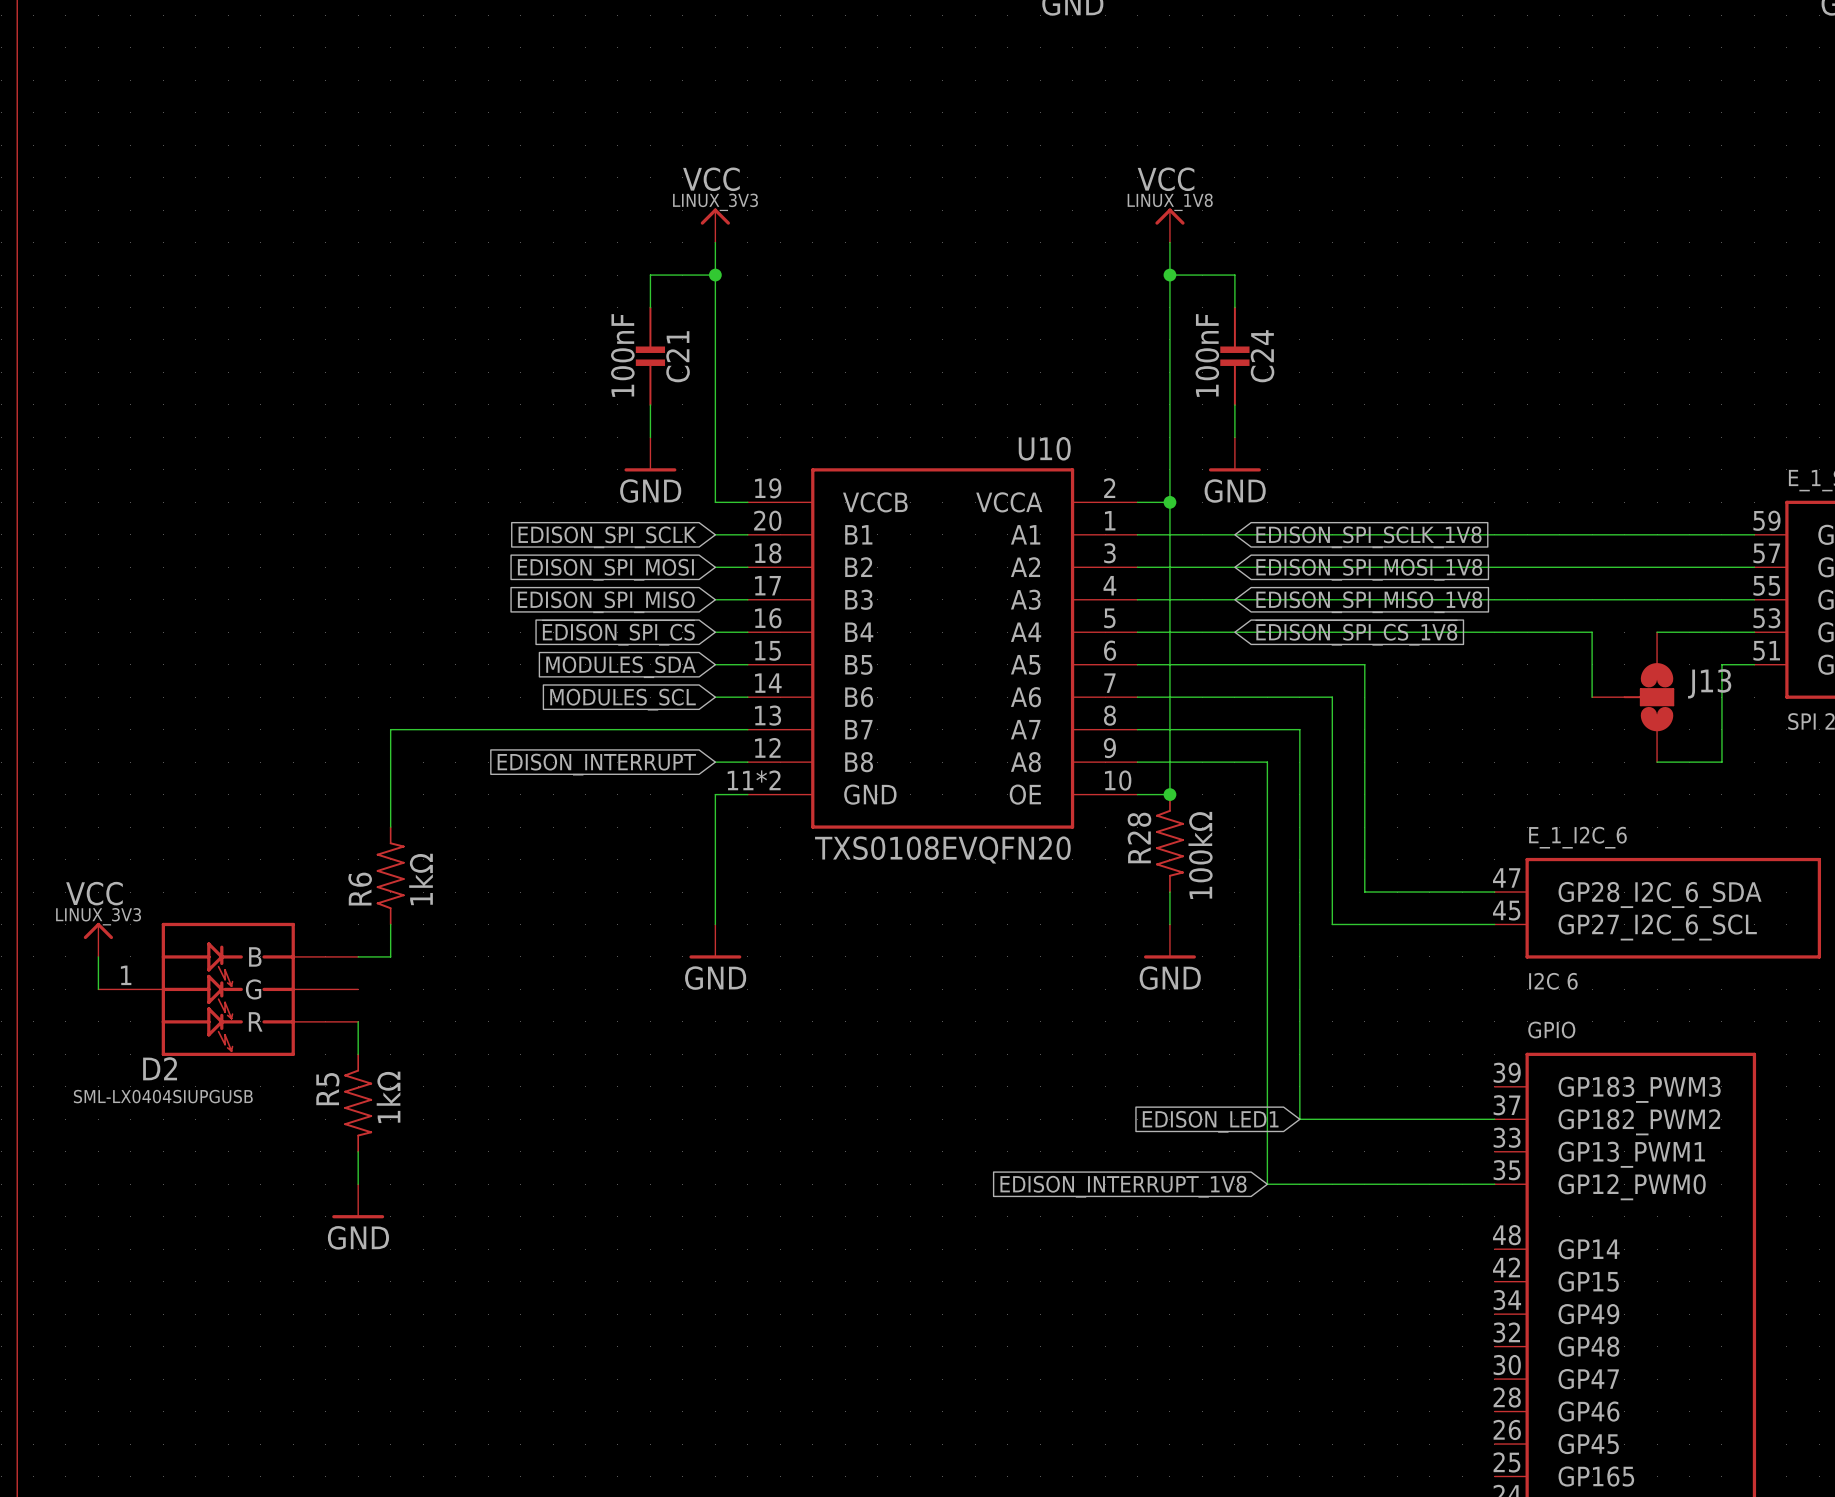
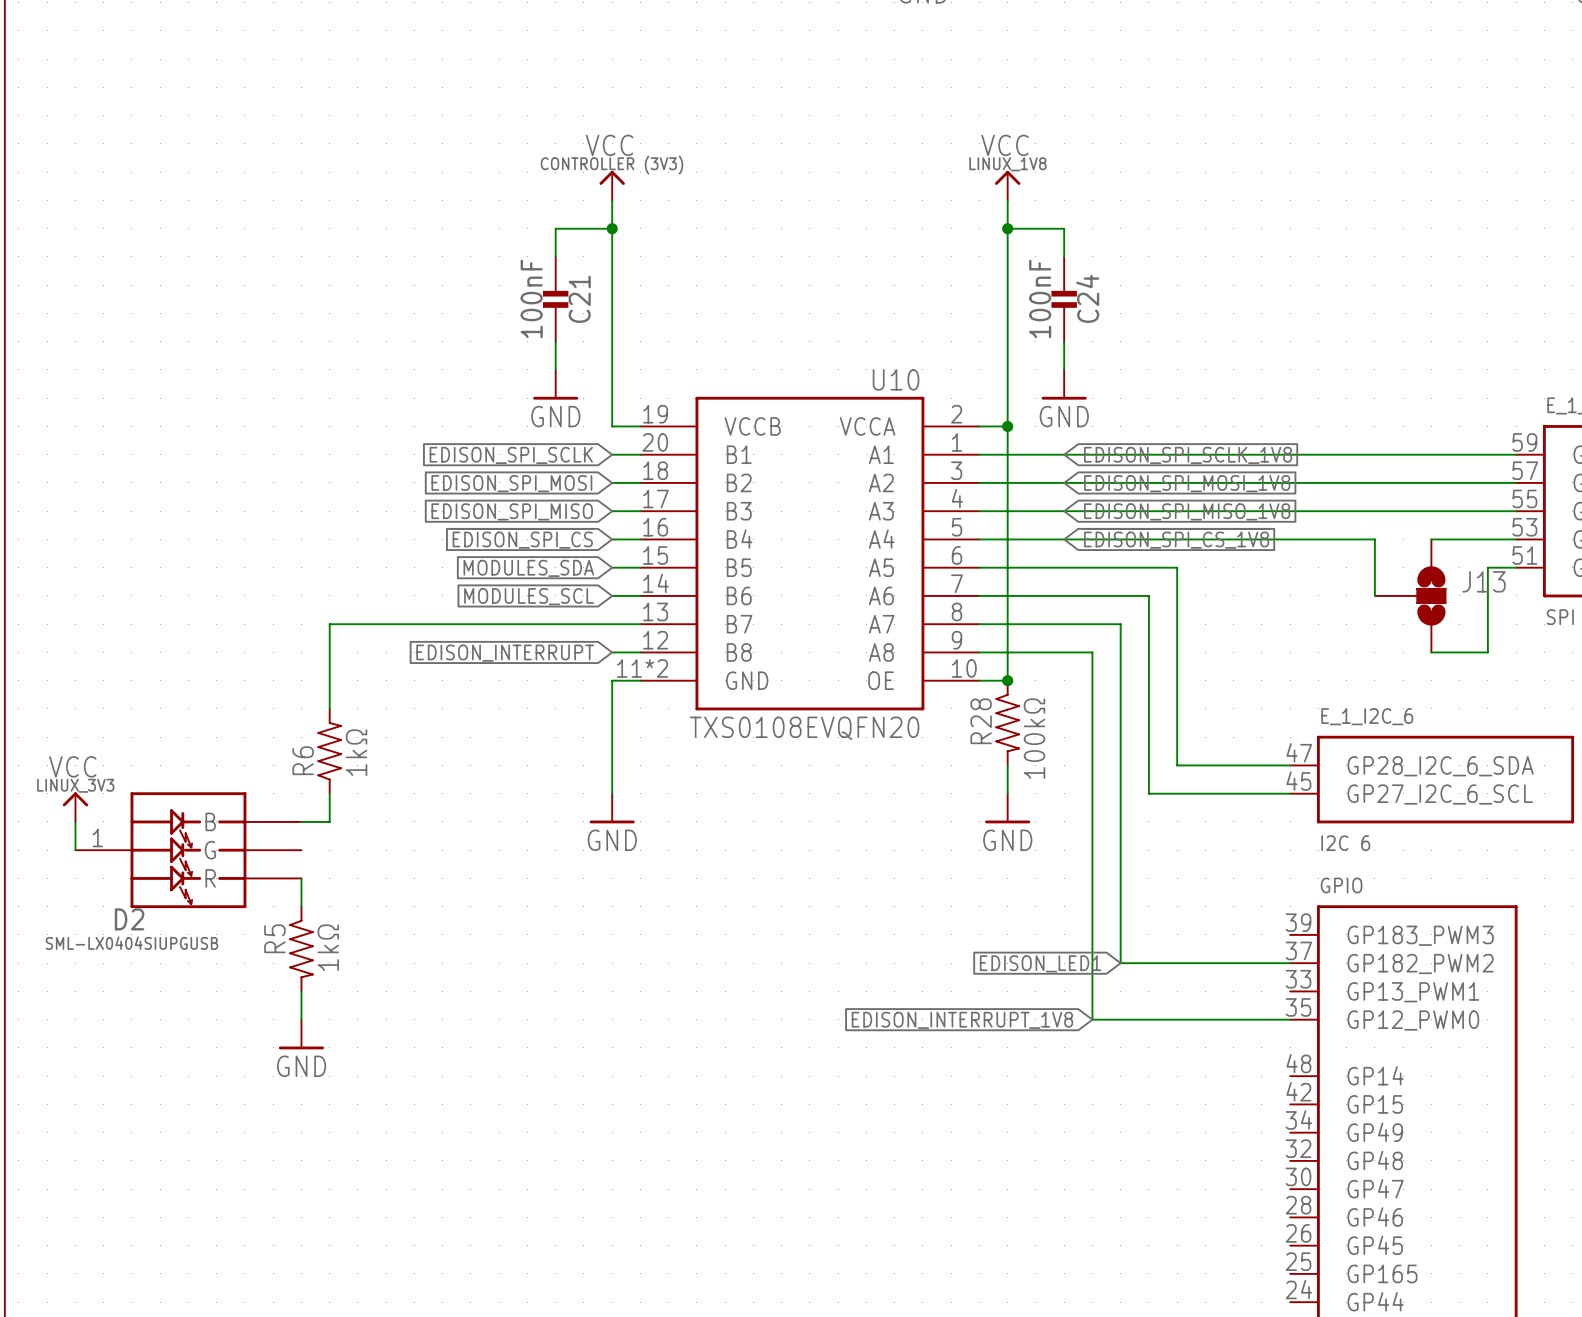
power symbol text: LINUX_3V3 (715, 202) -> CONTROLLER (3V3) (611, 165)

